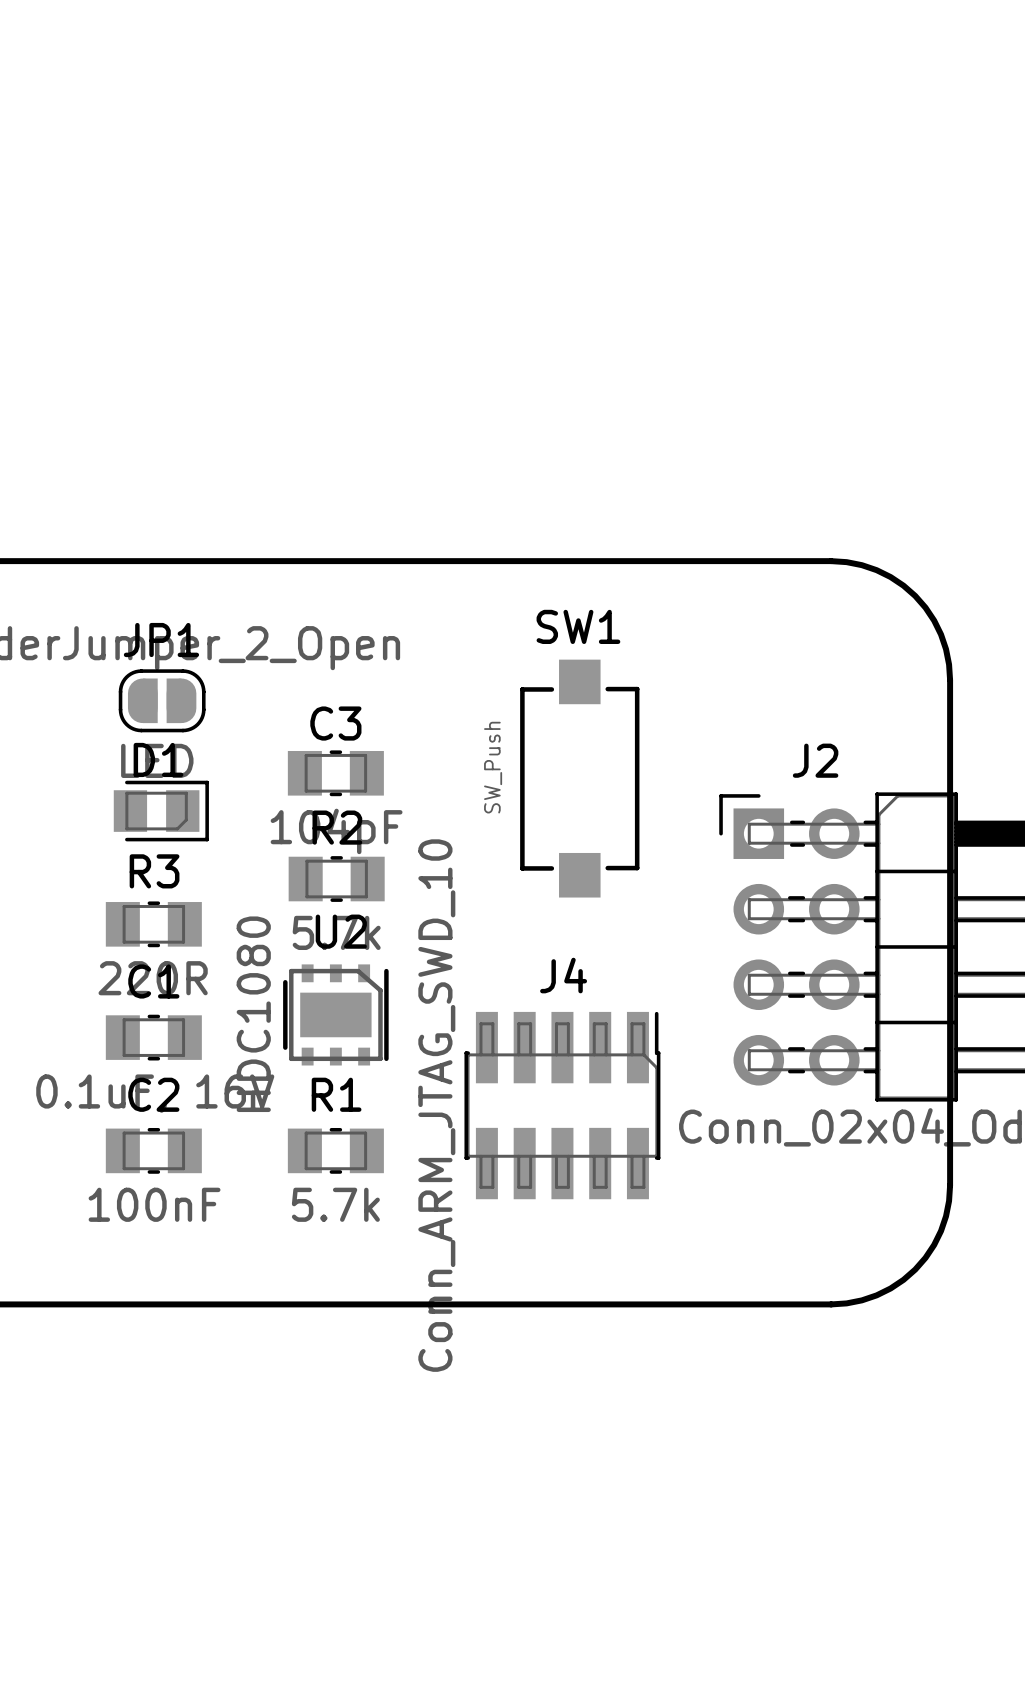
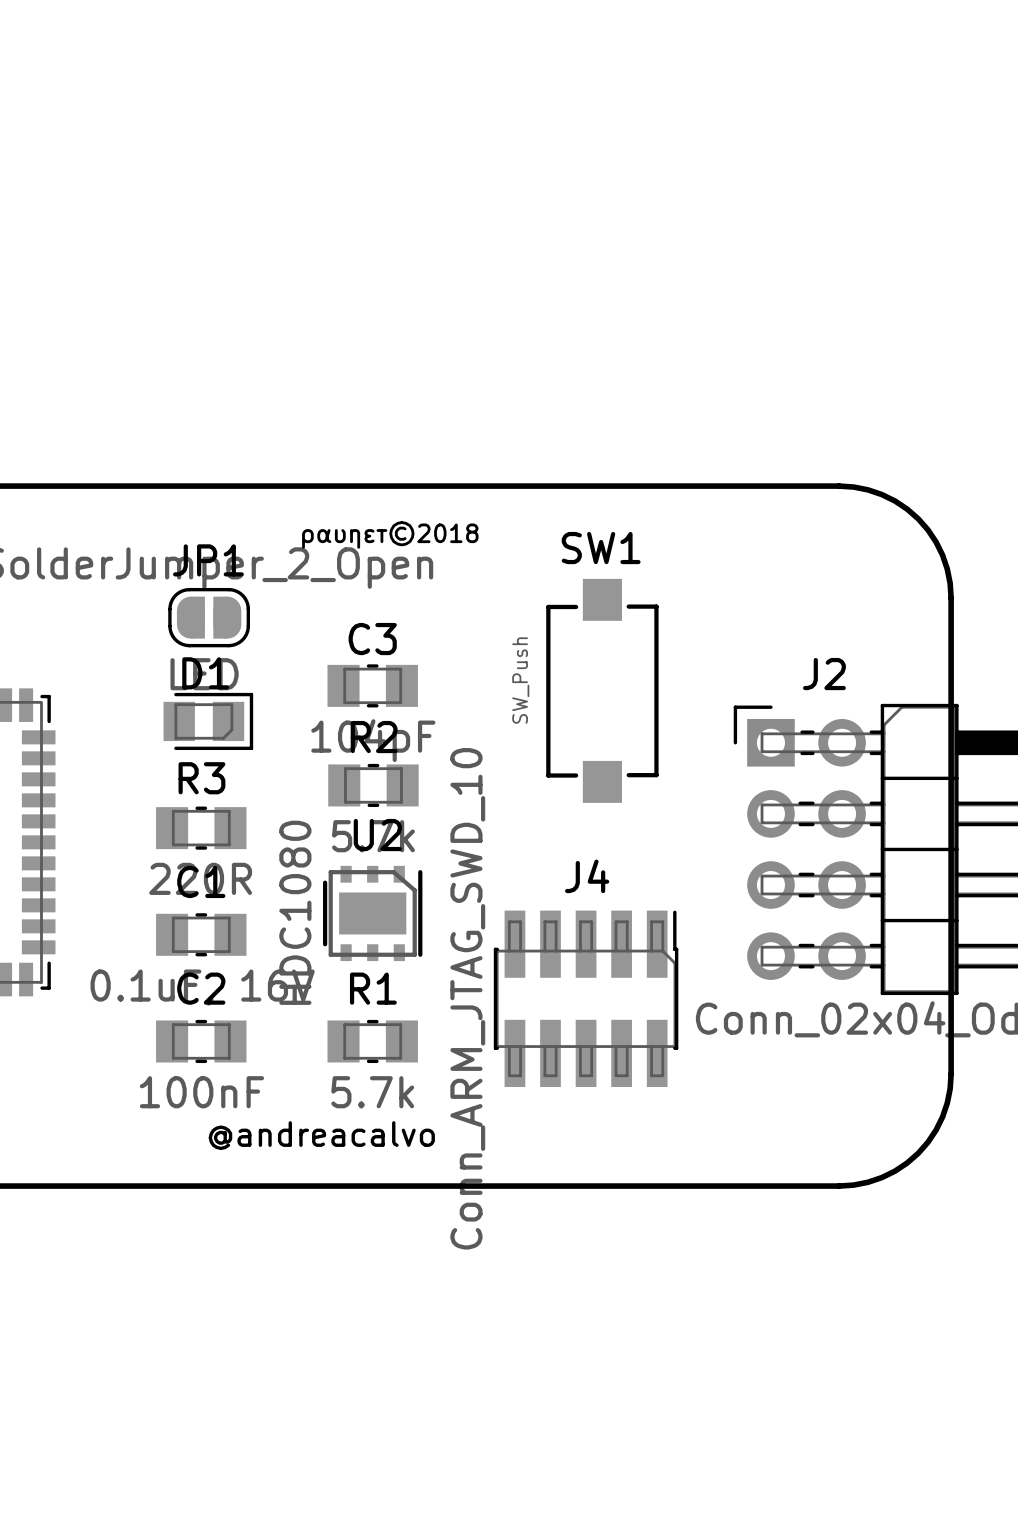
text: none -> ραυηεт©2018 (390, 534)
text: none -> @andreacalvo (321, 1135)

